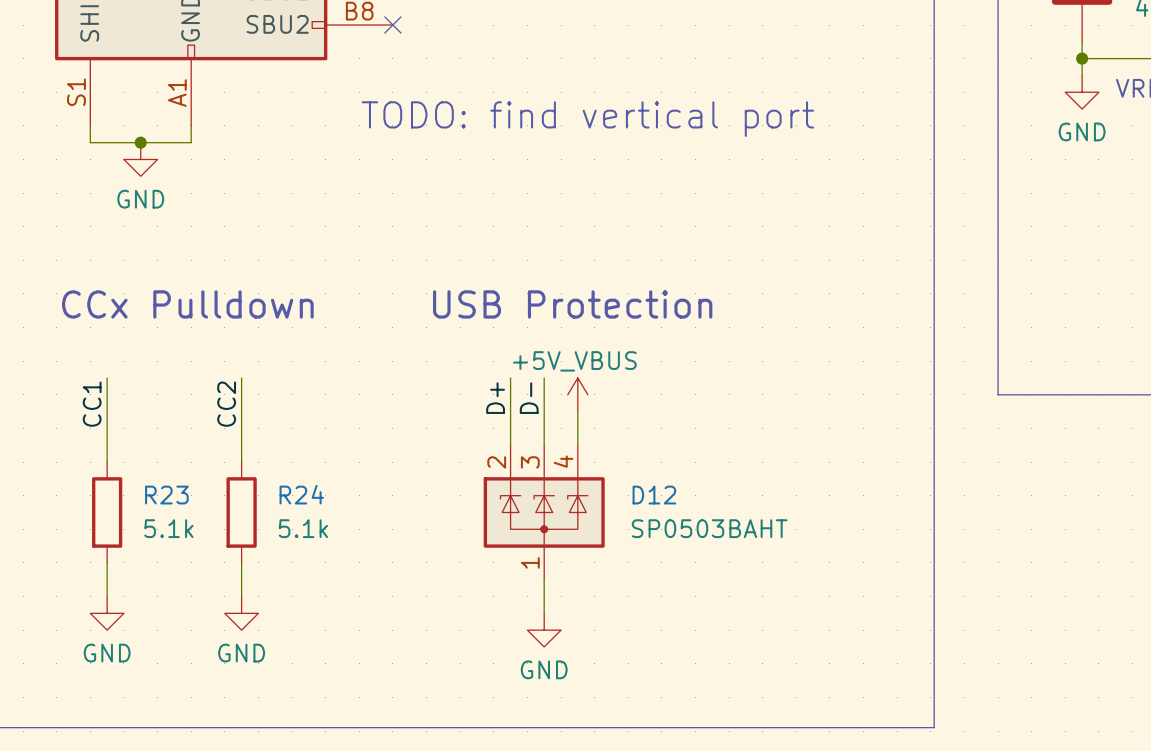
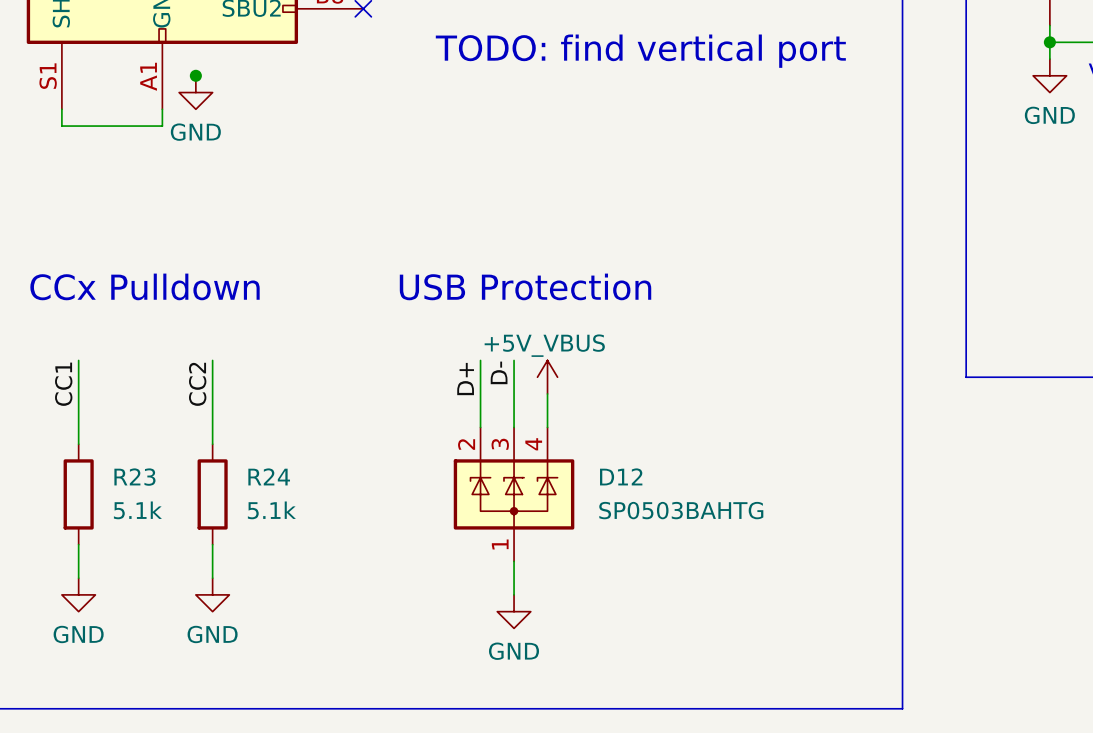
junction: none -> (195, 75)
text position: TODO: find vertical port (587, 119) -> TODO: find vertical port (640, 51)
junction: (140, 142) -> none
power symbol position: GND (140, 159) -> GND (195, 92)
D12 value: SP0503BAHT (709, 528) -> SP0503BAHTG (681, 510)

